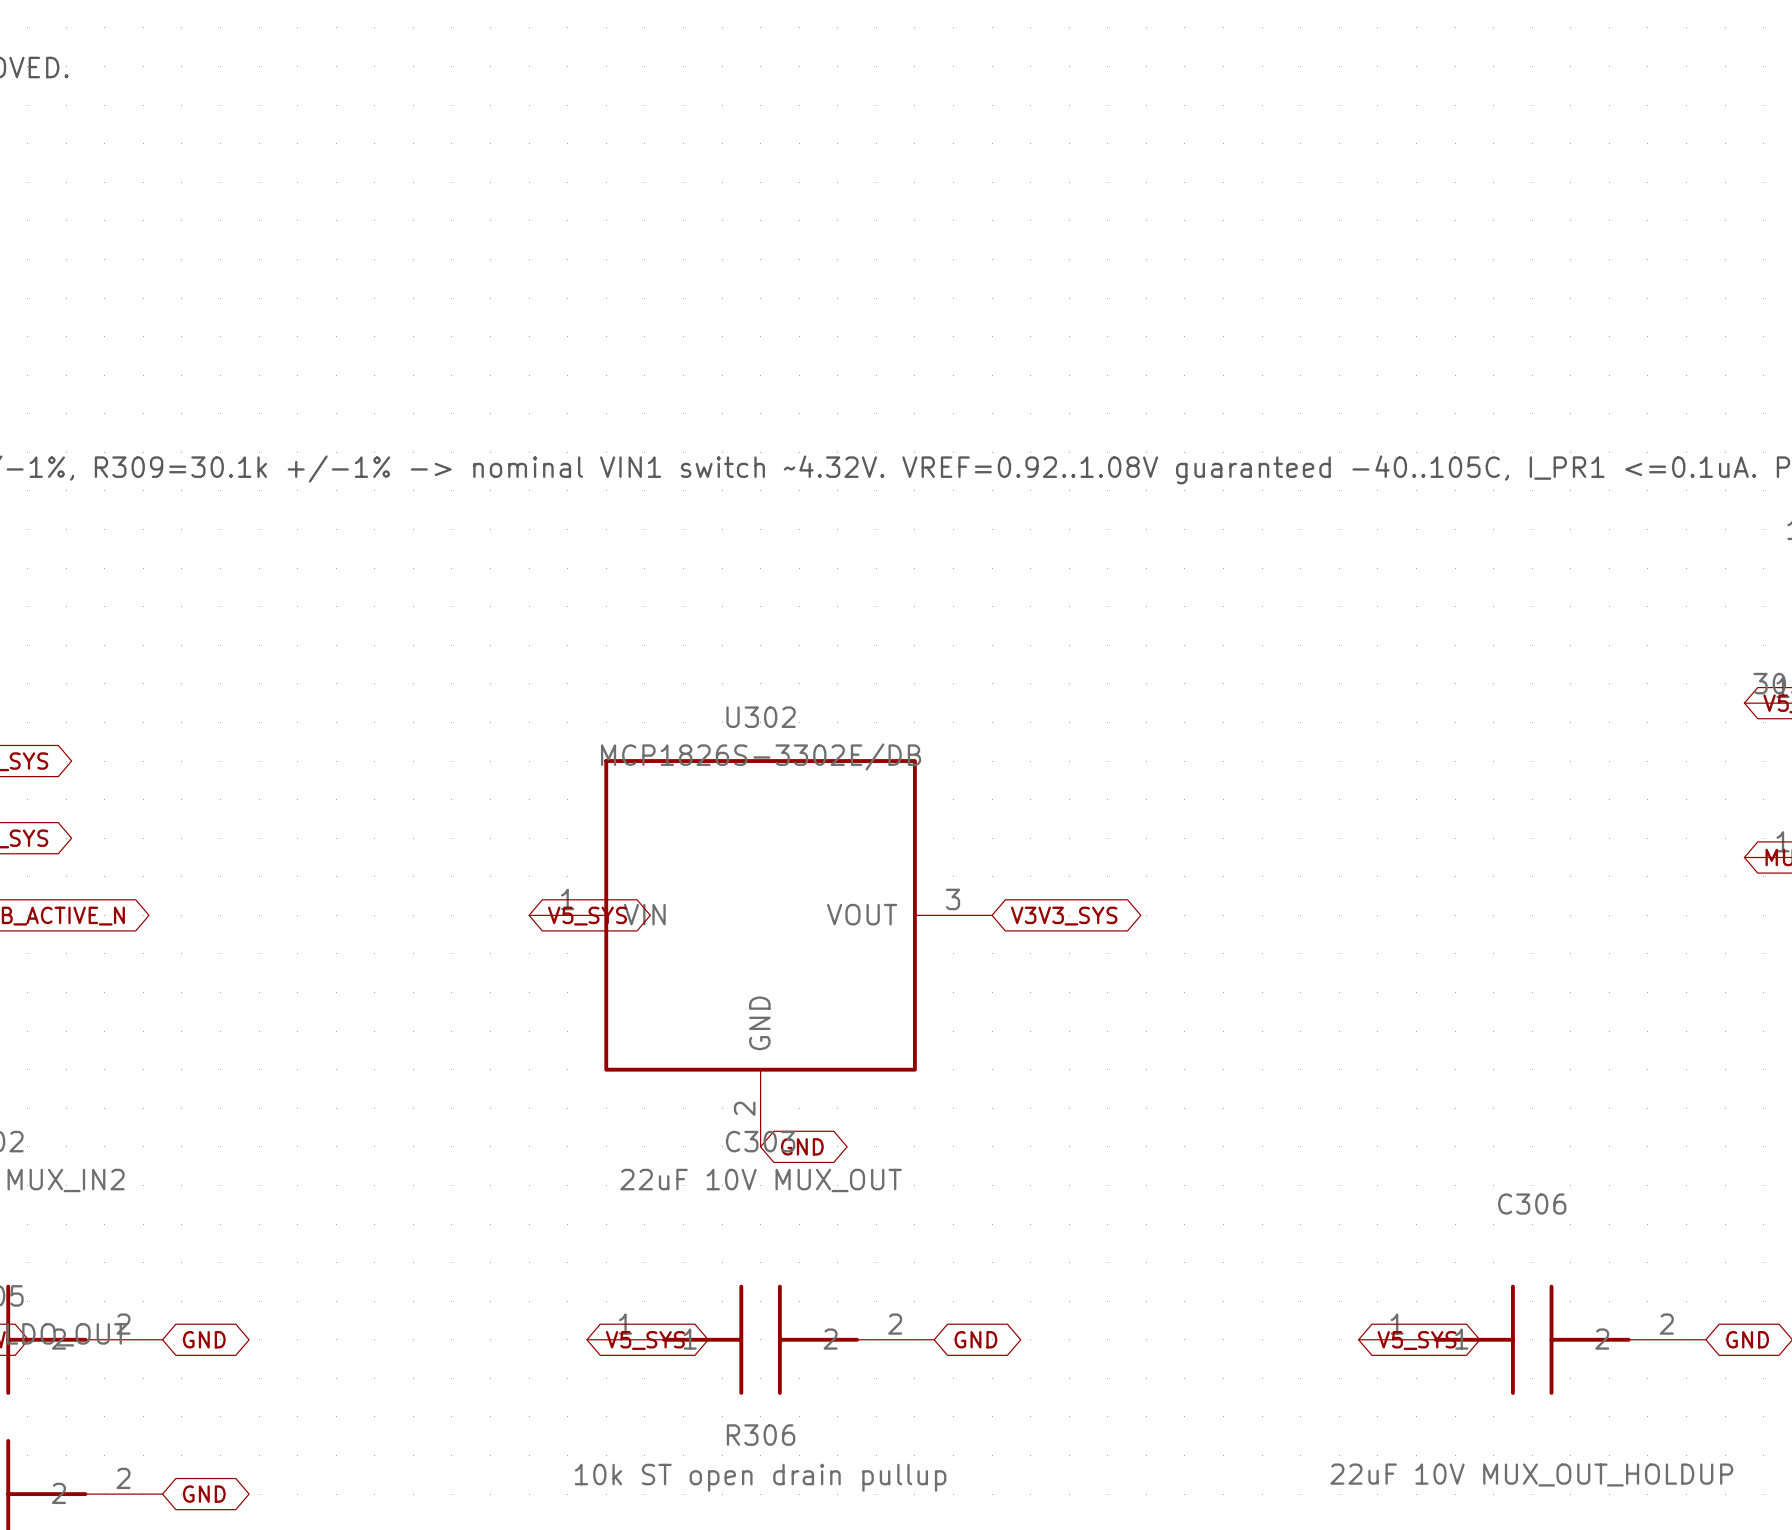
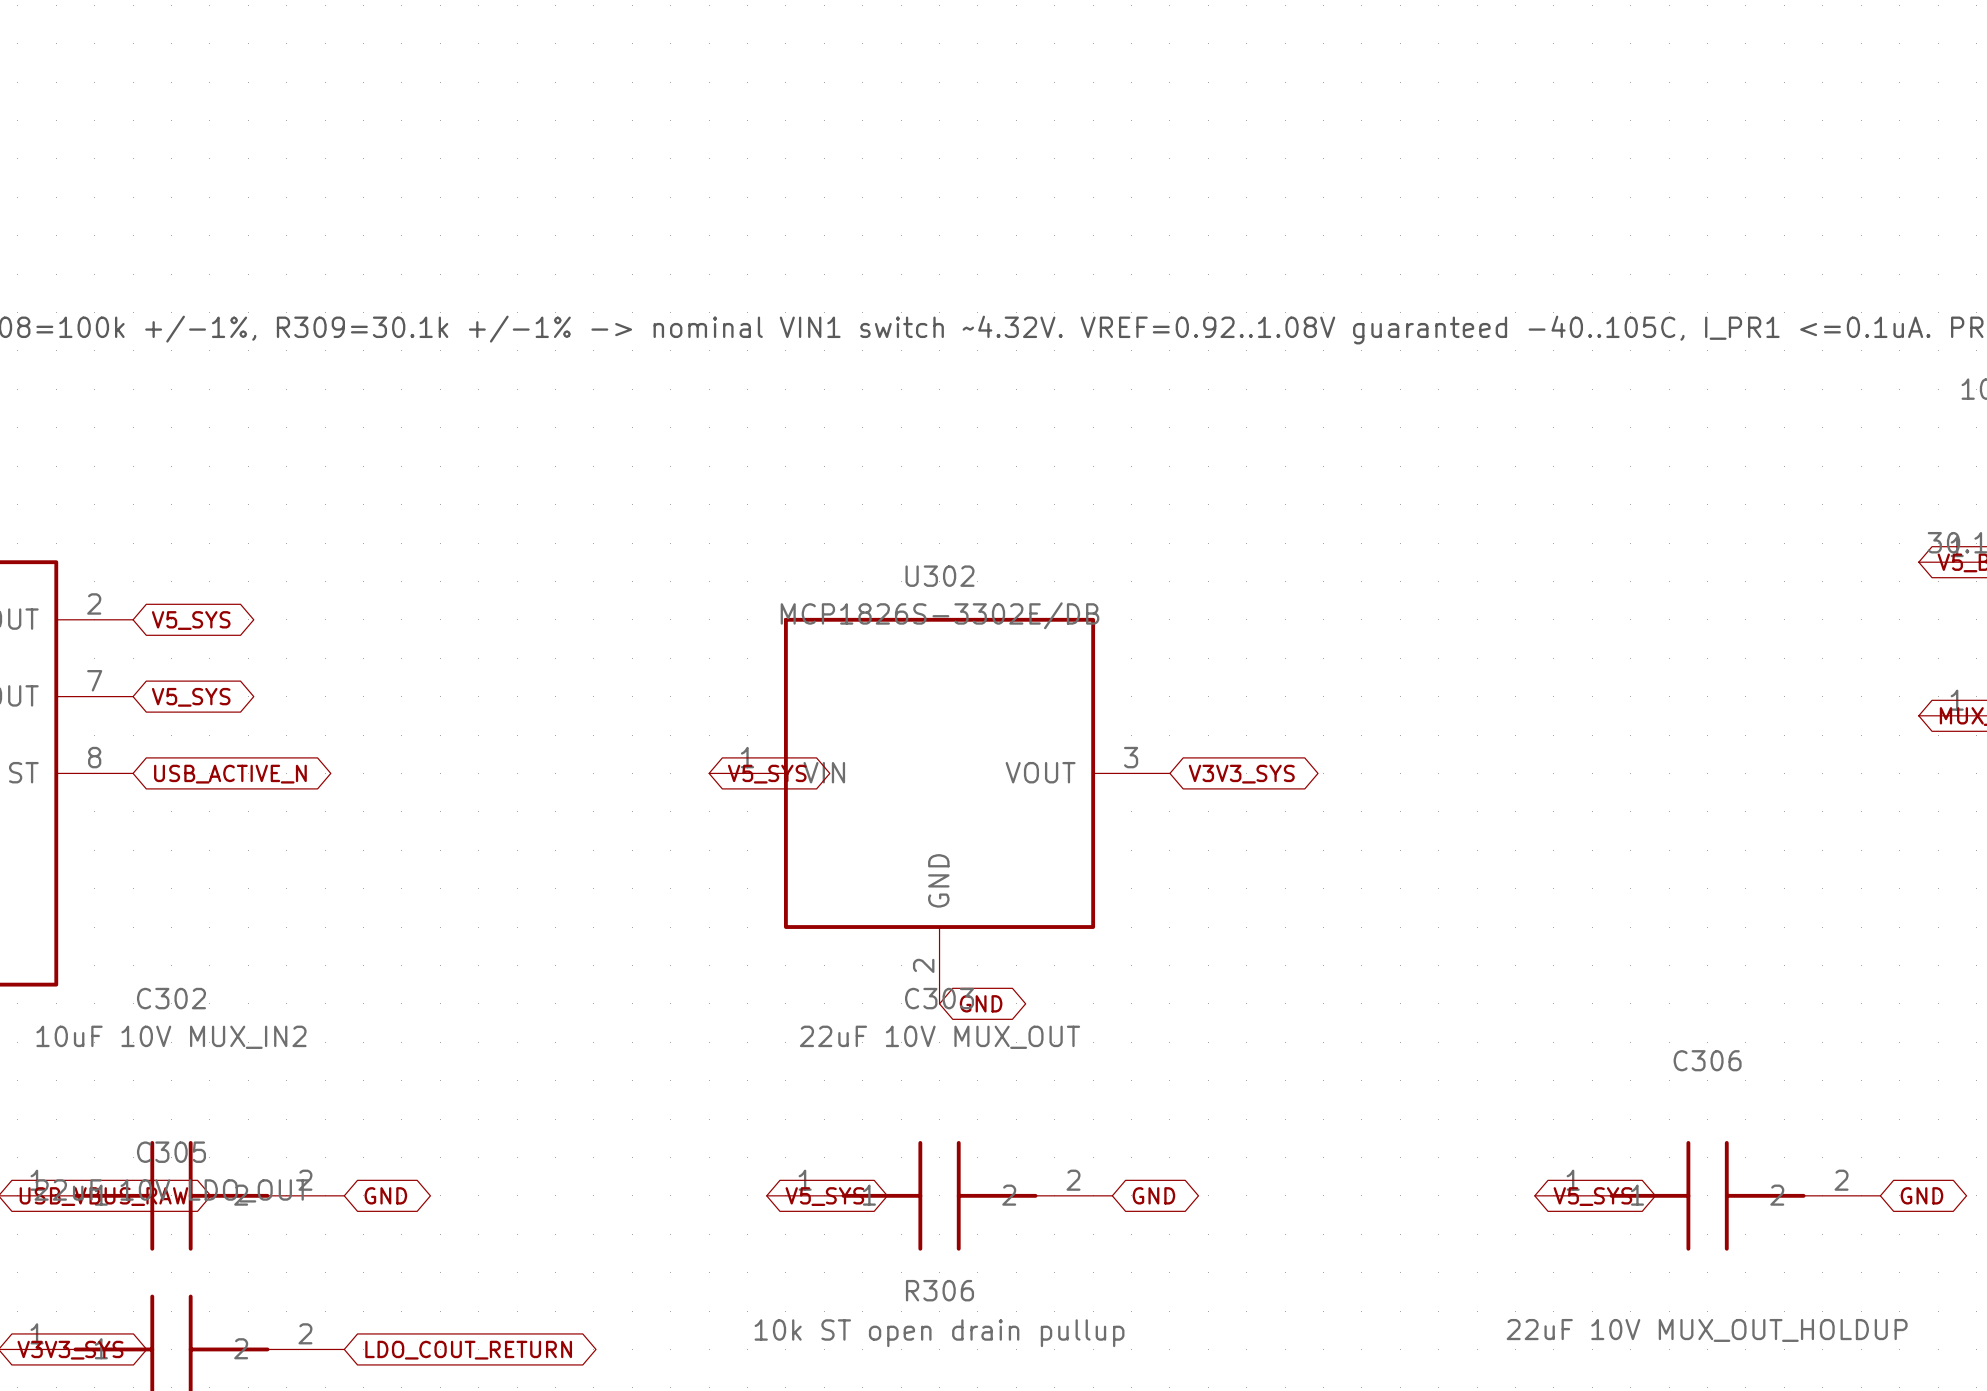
global label: GND (204, 1494) -> LDO_COUT_RETURN (468, 1350)

